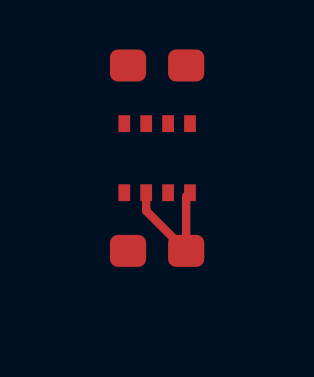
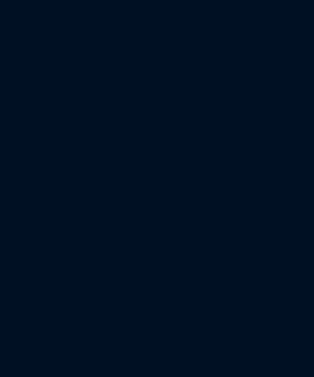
part: (157, 65) -> none
part: (157, 158) -> none
top track: (189, 192) (186, 196) (186, 250) (146, 210) (146, 192) -> none
part: (157, 250) -> none

